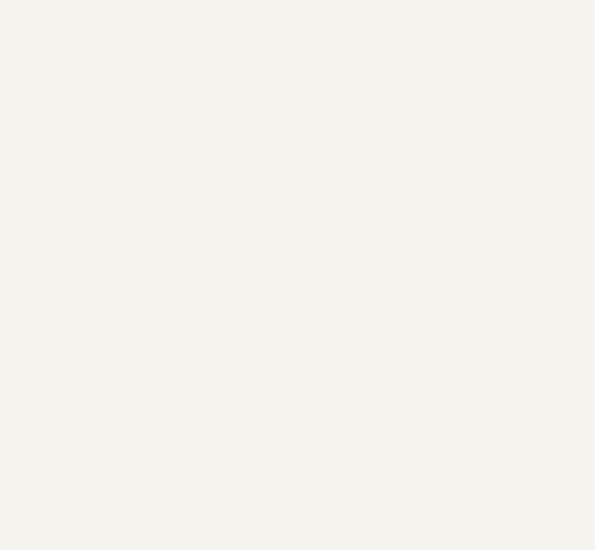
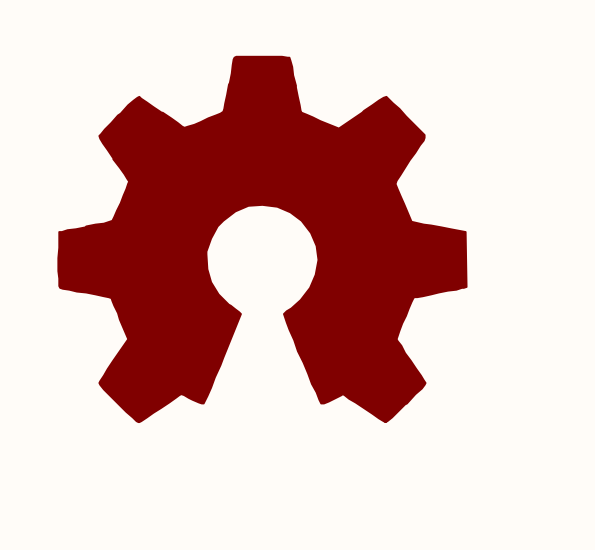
power symbol: none -> (262, 239)

